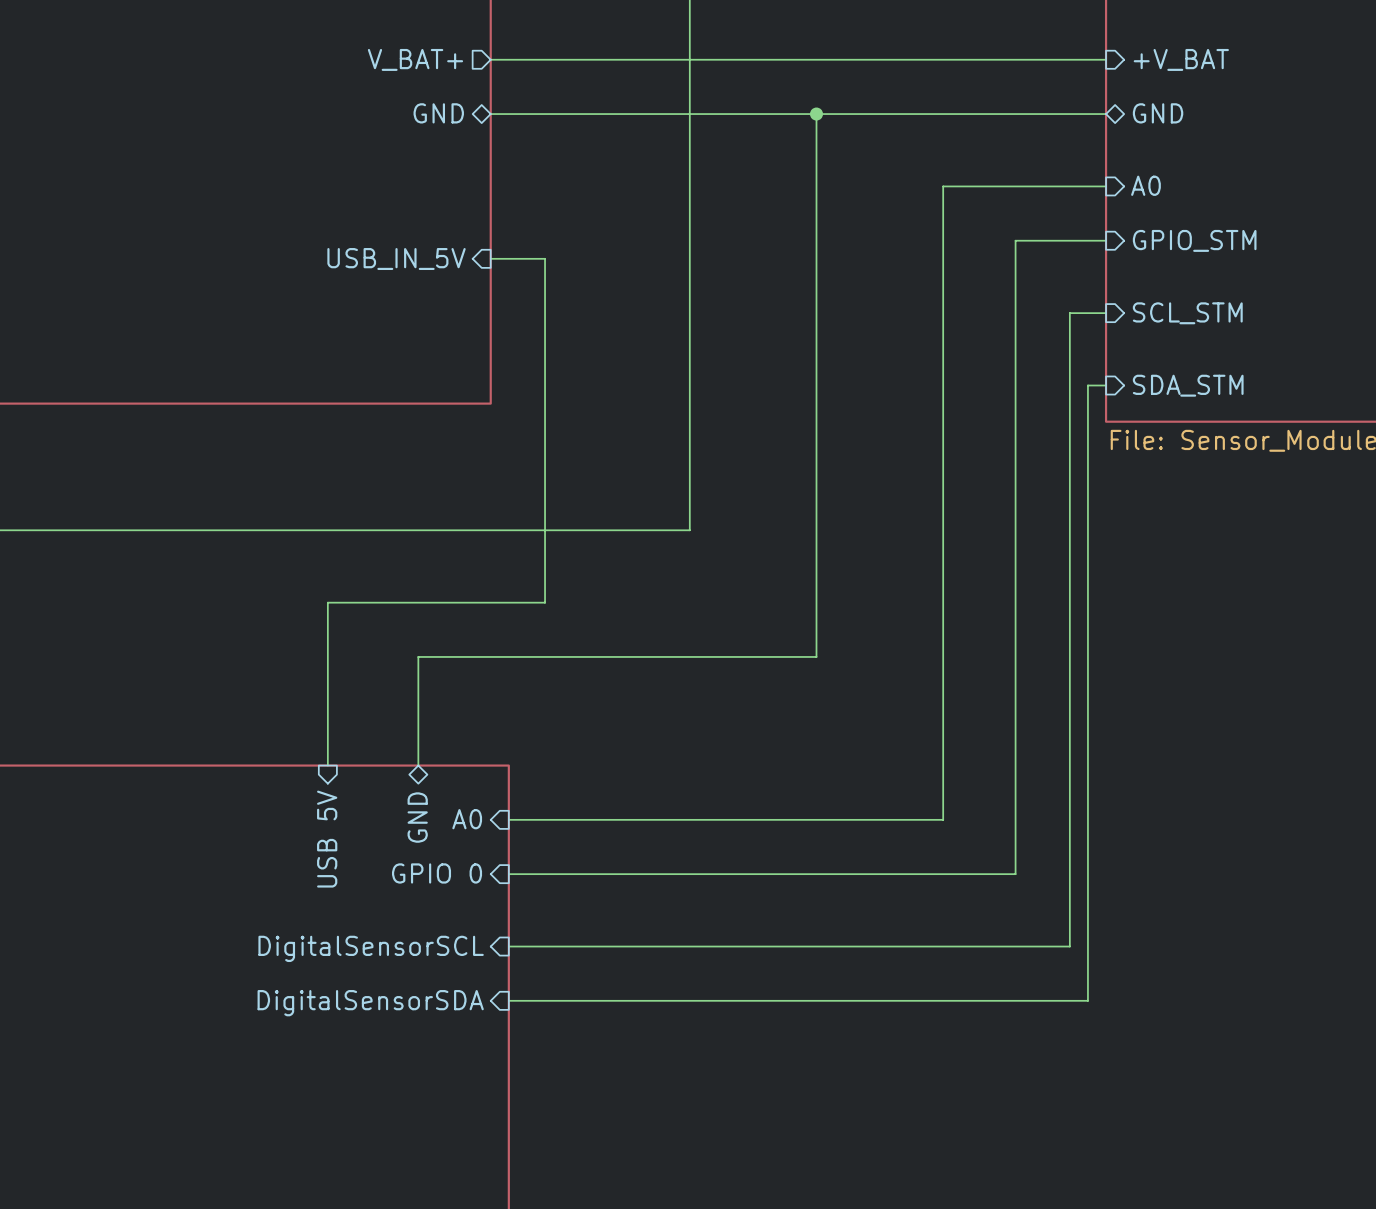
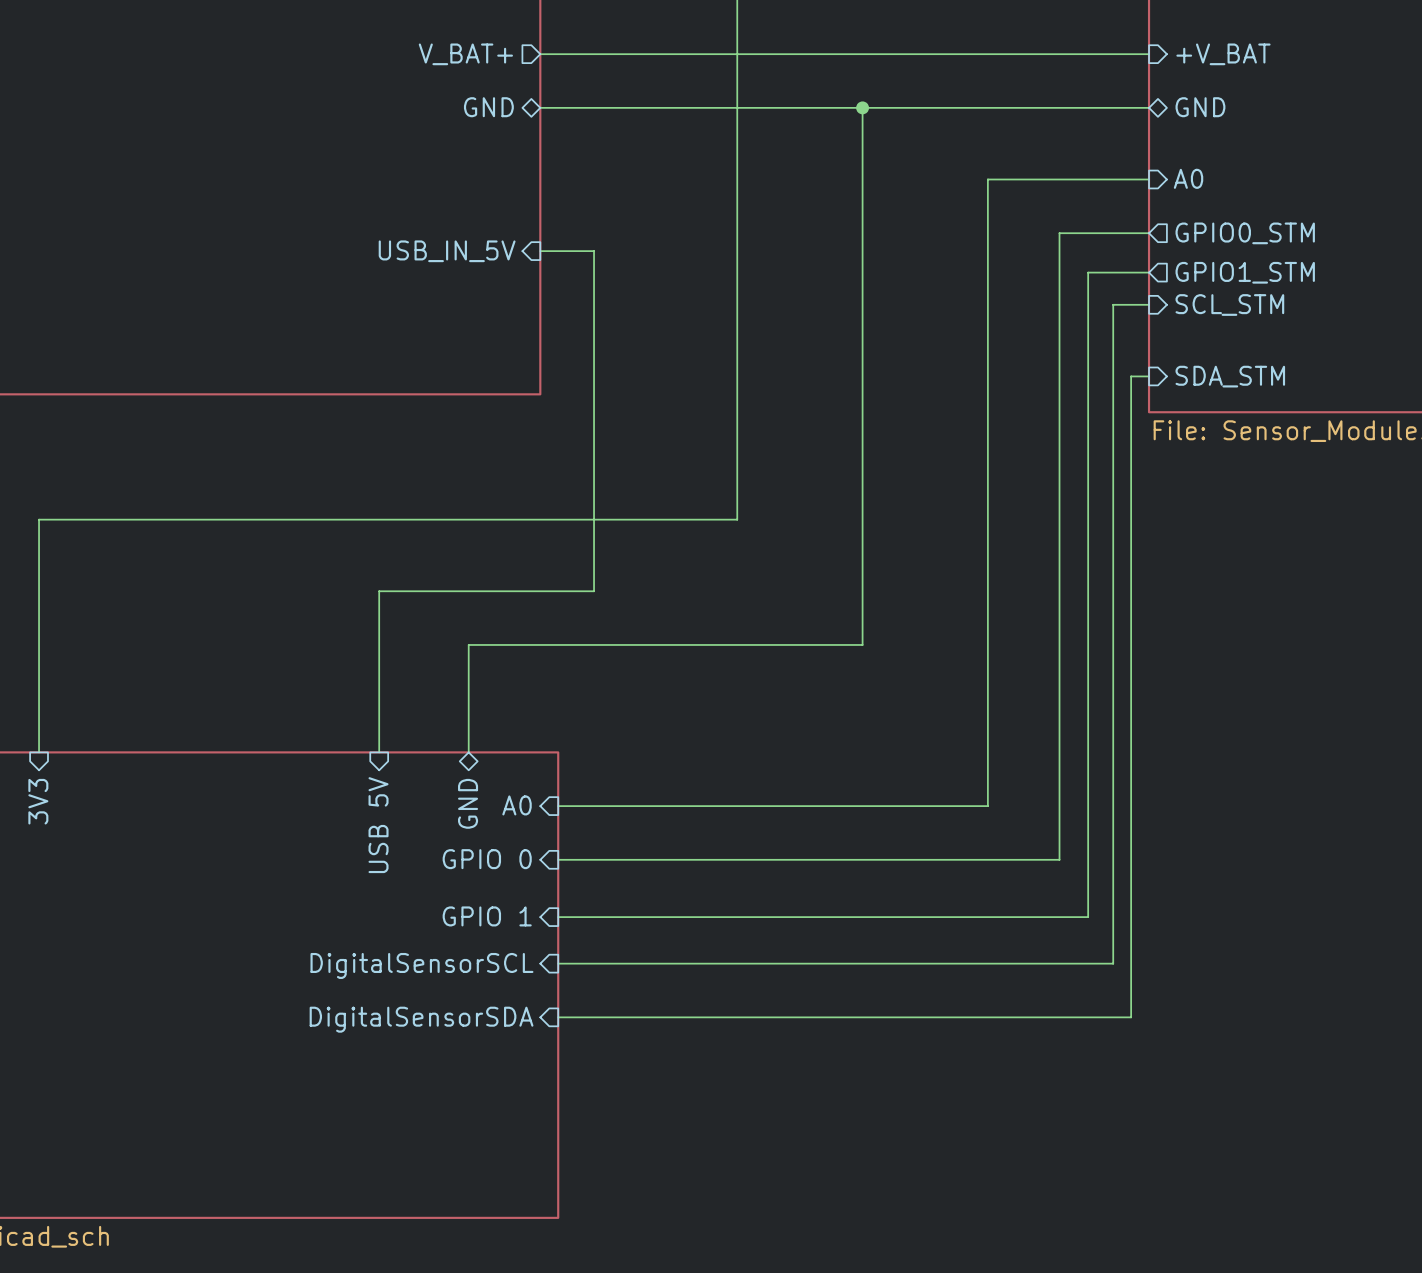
sheet pin shape: input (1194, 240) -> output (1245, 233)
sheet pin: GPIO_STM (1194, 240) -> GPIO0_STM (1245, 233)
wire: none -> (1149, 272) (1088, 272) (1088, 917) (558, 917)
sheet pin: none -> GPIO1_STM (1245, 272)
sheet pin: none -> GPIO 1 (487, 916)
wire: (508, 946) (1069, 946) -> (558, 963) (1113, 963) (1113, 931)
sheet pin position: DigitalSensorSCL (371, 948) -> DigitalSensorSCL (421, 965)
wire: (508, 1000) (1087, 1000) -> (558, 1017) (1131, 1017) (1131, 985)
sheet pin position: DigitalSensorSDA (370, 1003) -> DigitalSensorSDA (421, 1019)

